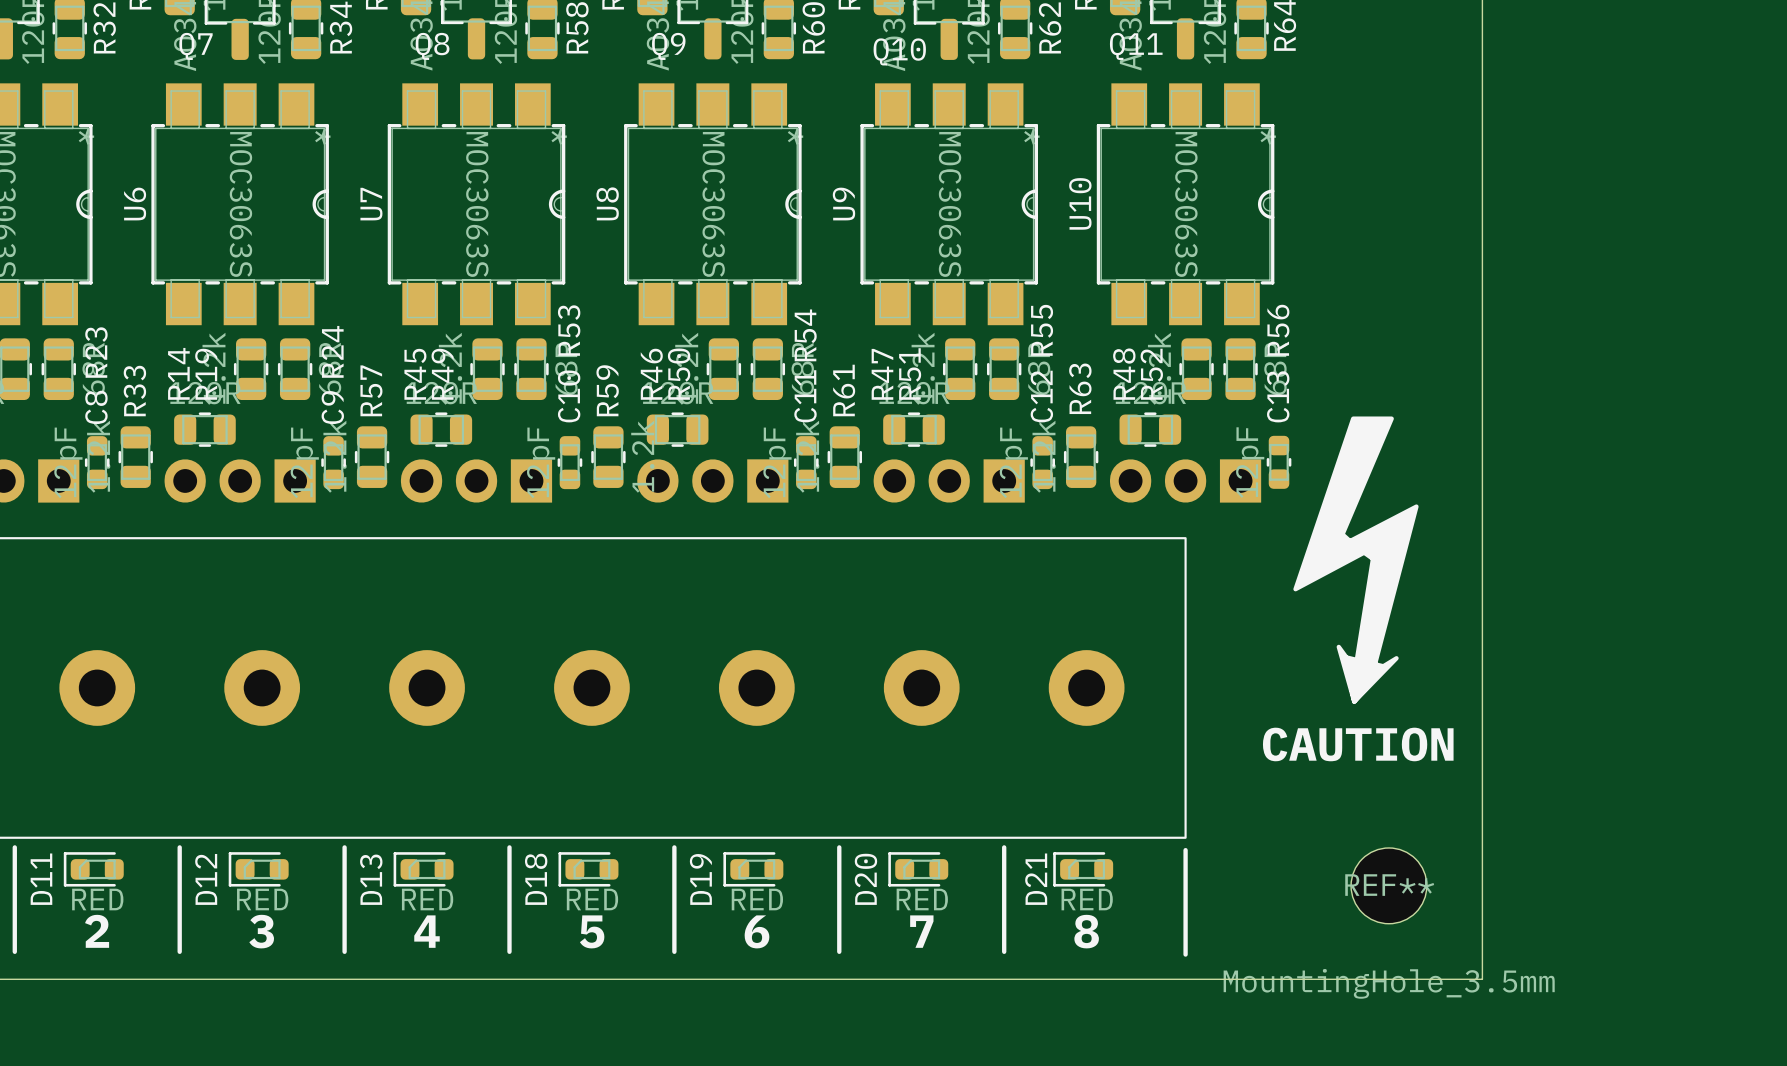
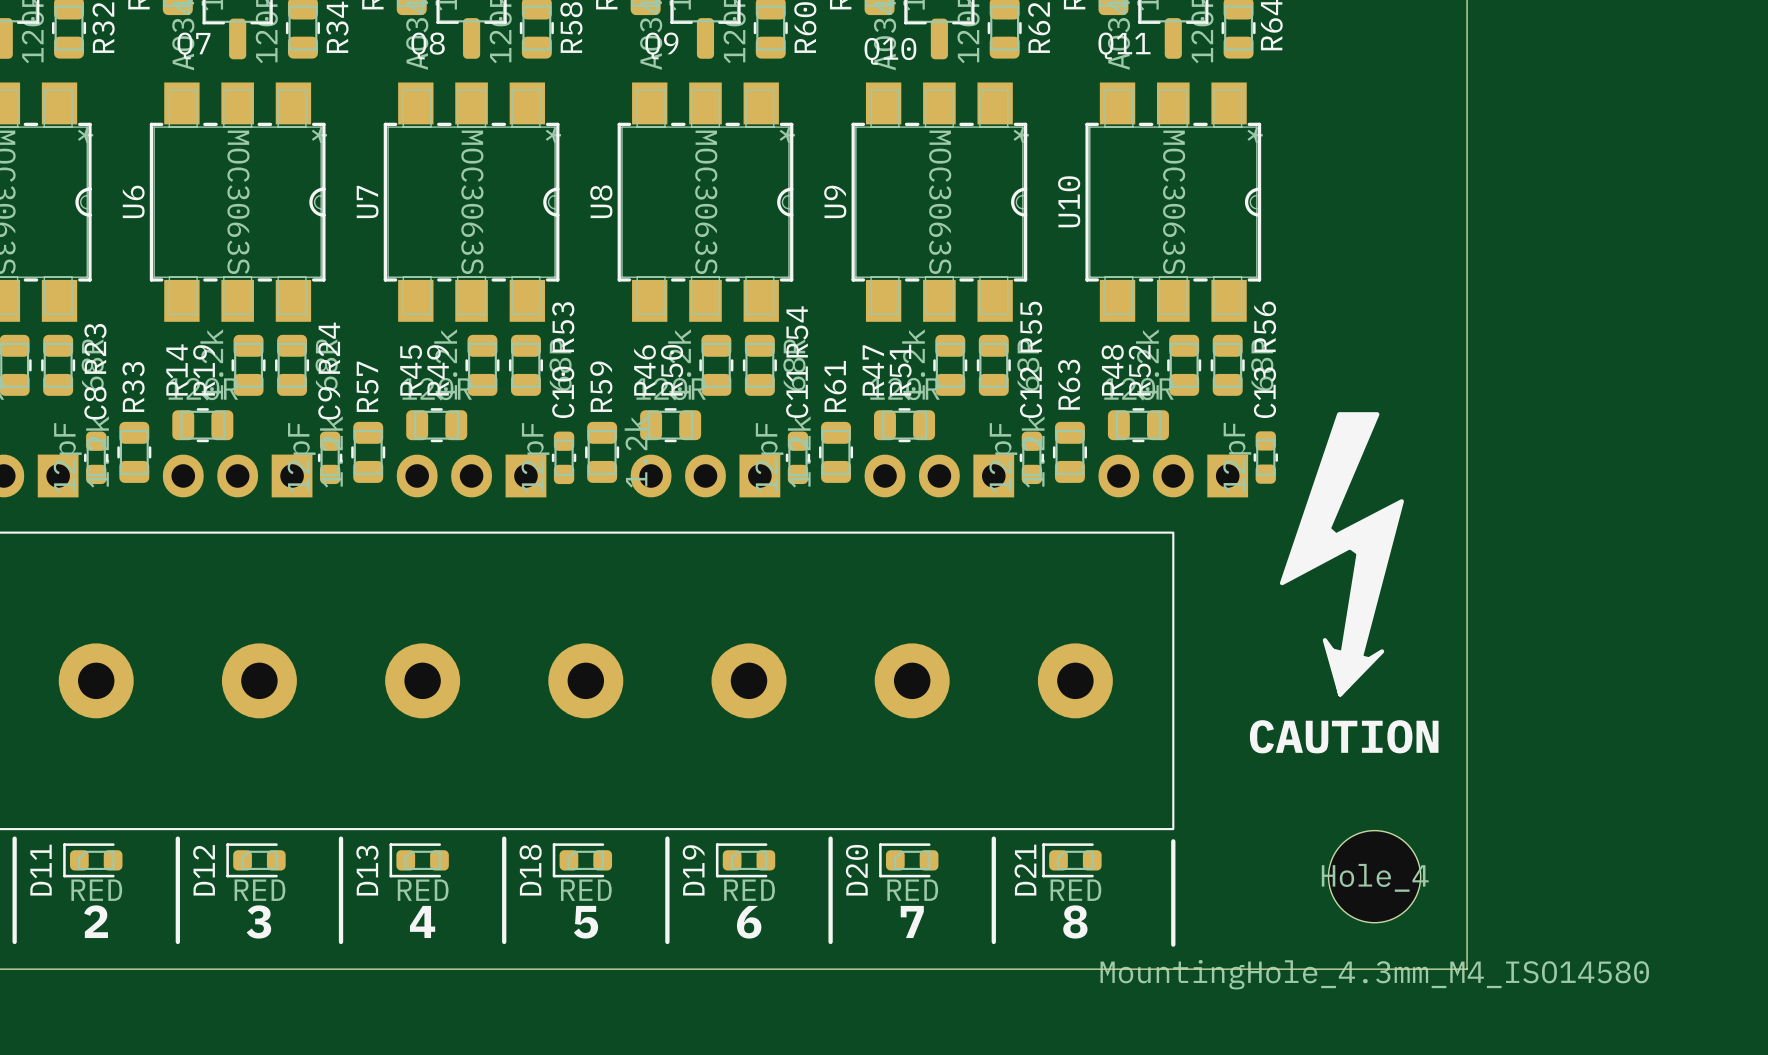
REF**: MountingHole_3.5mm (1388, 885) -> none
Hole_4: none -> MountingHole_4.3mm_M4_ISO14580 (1374, 876)

